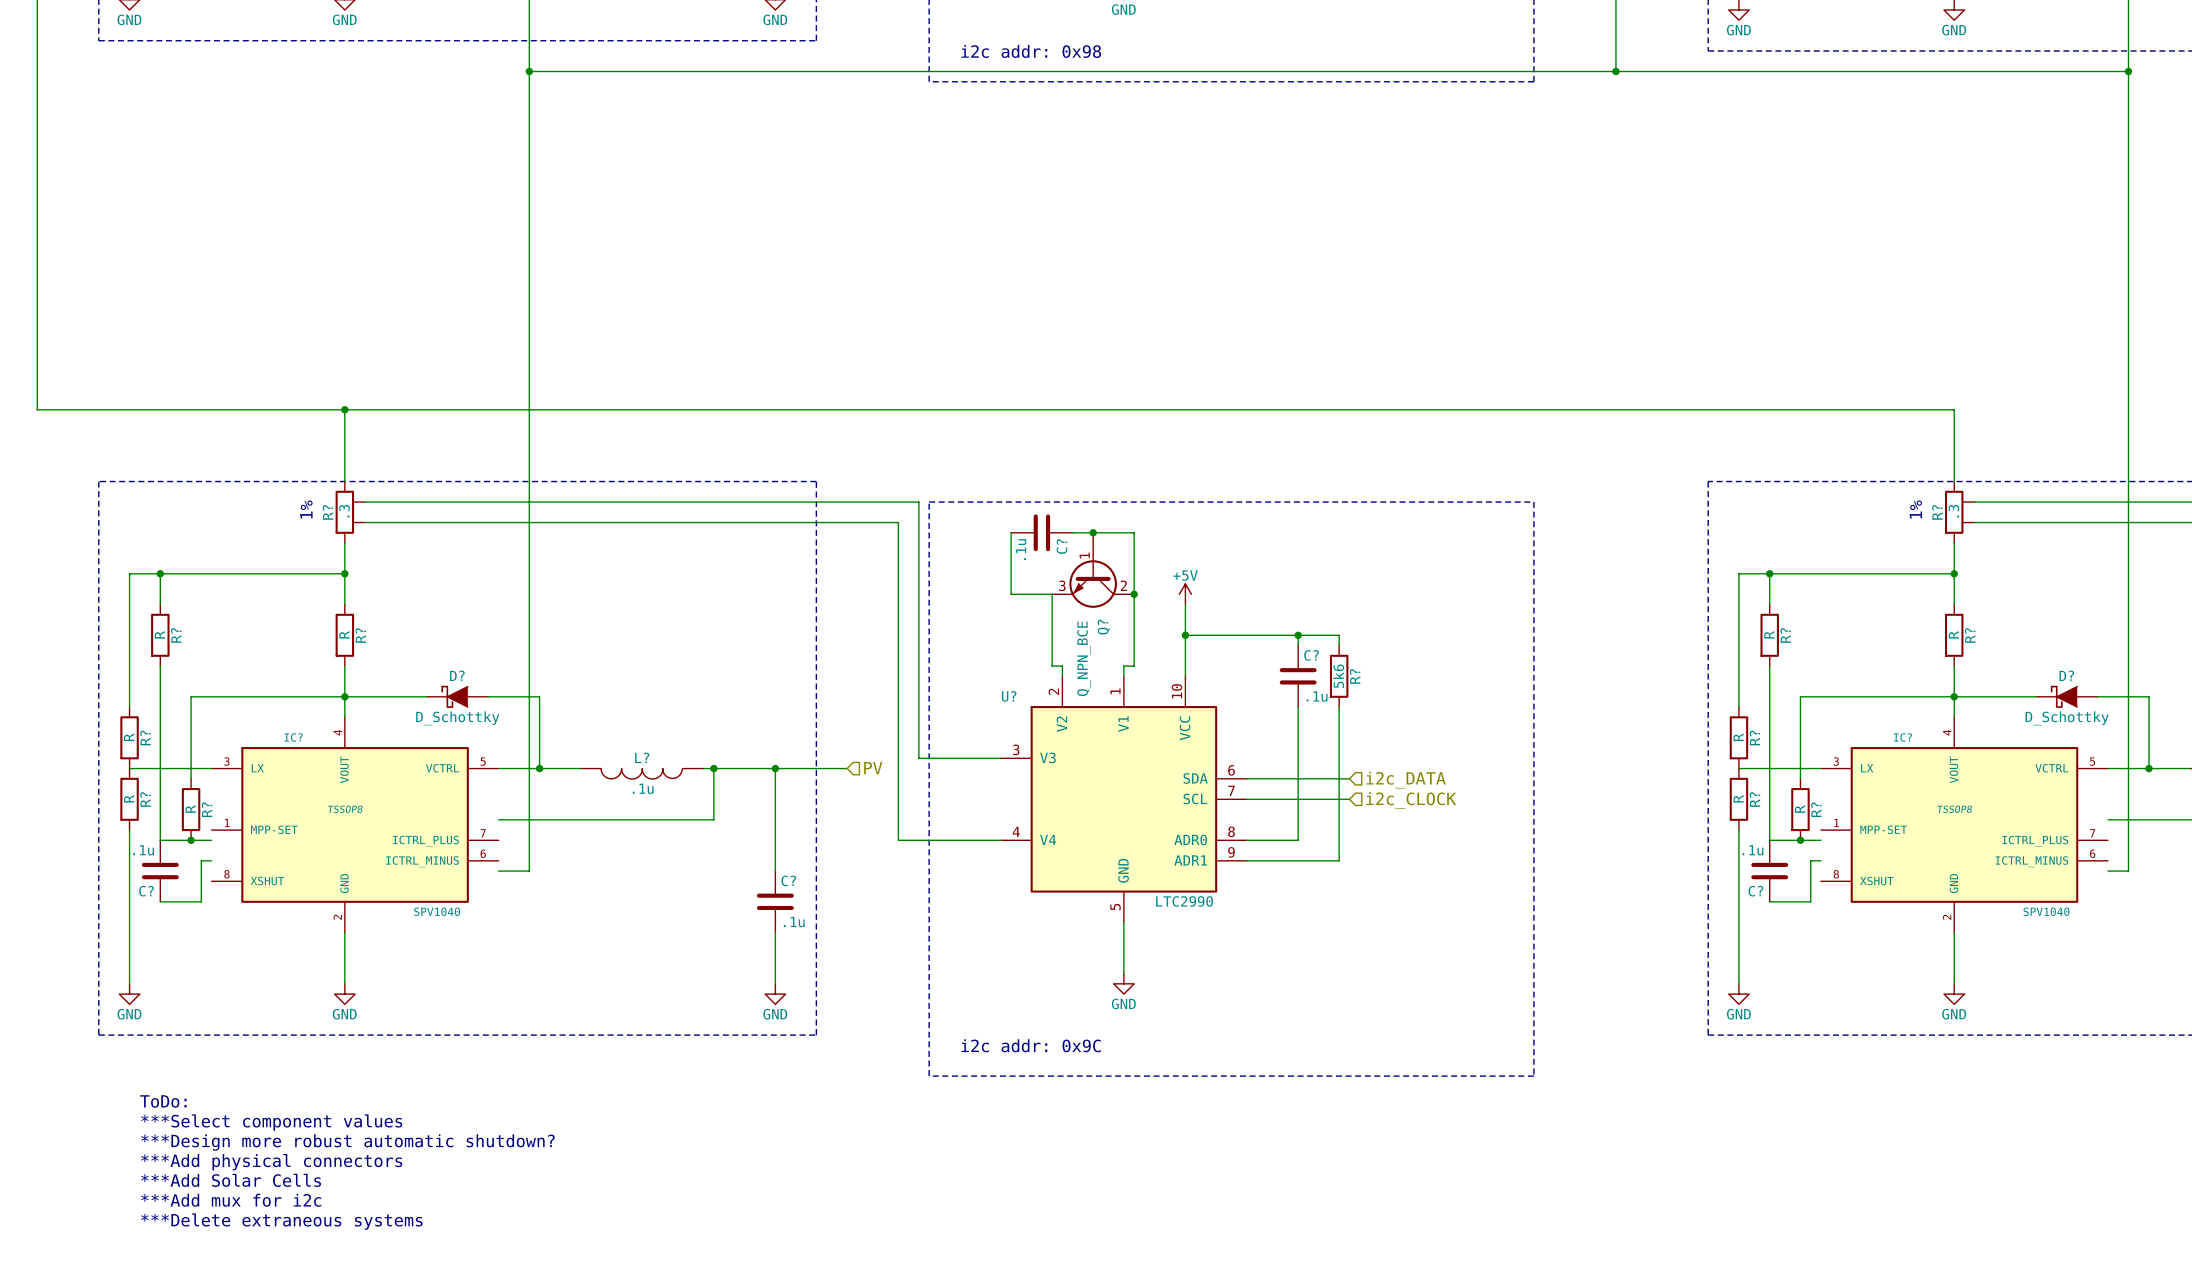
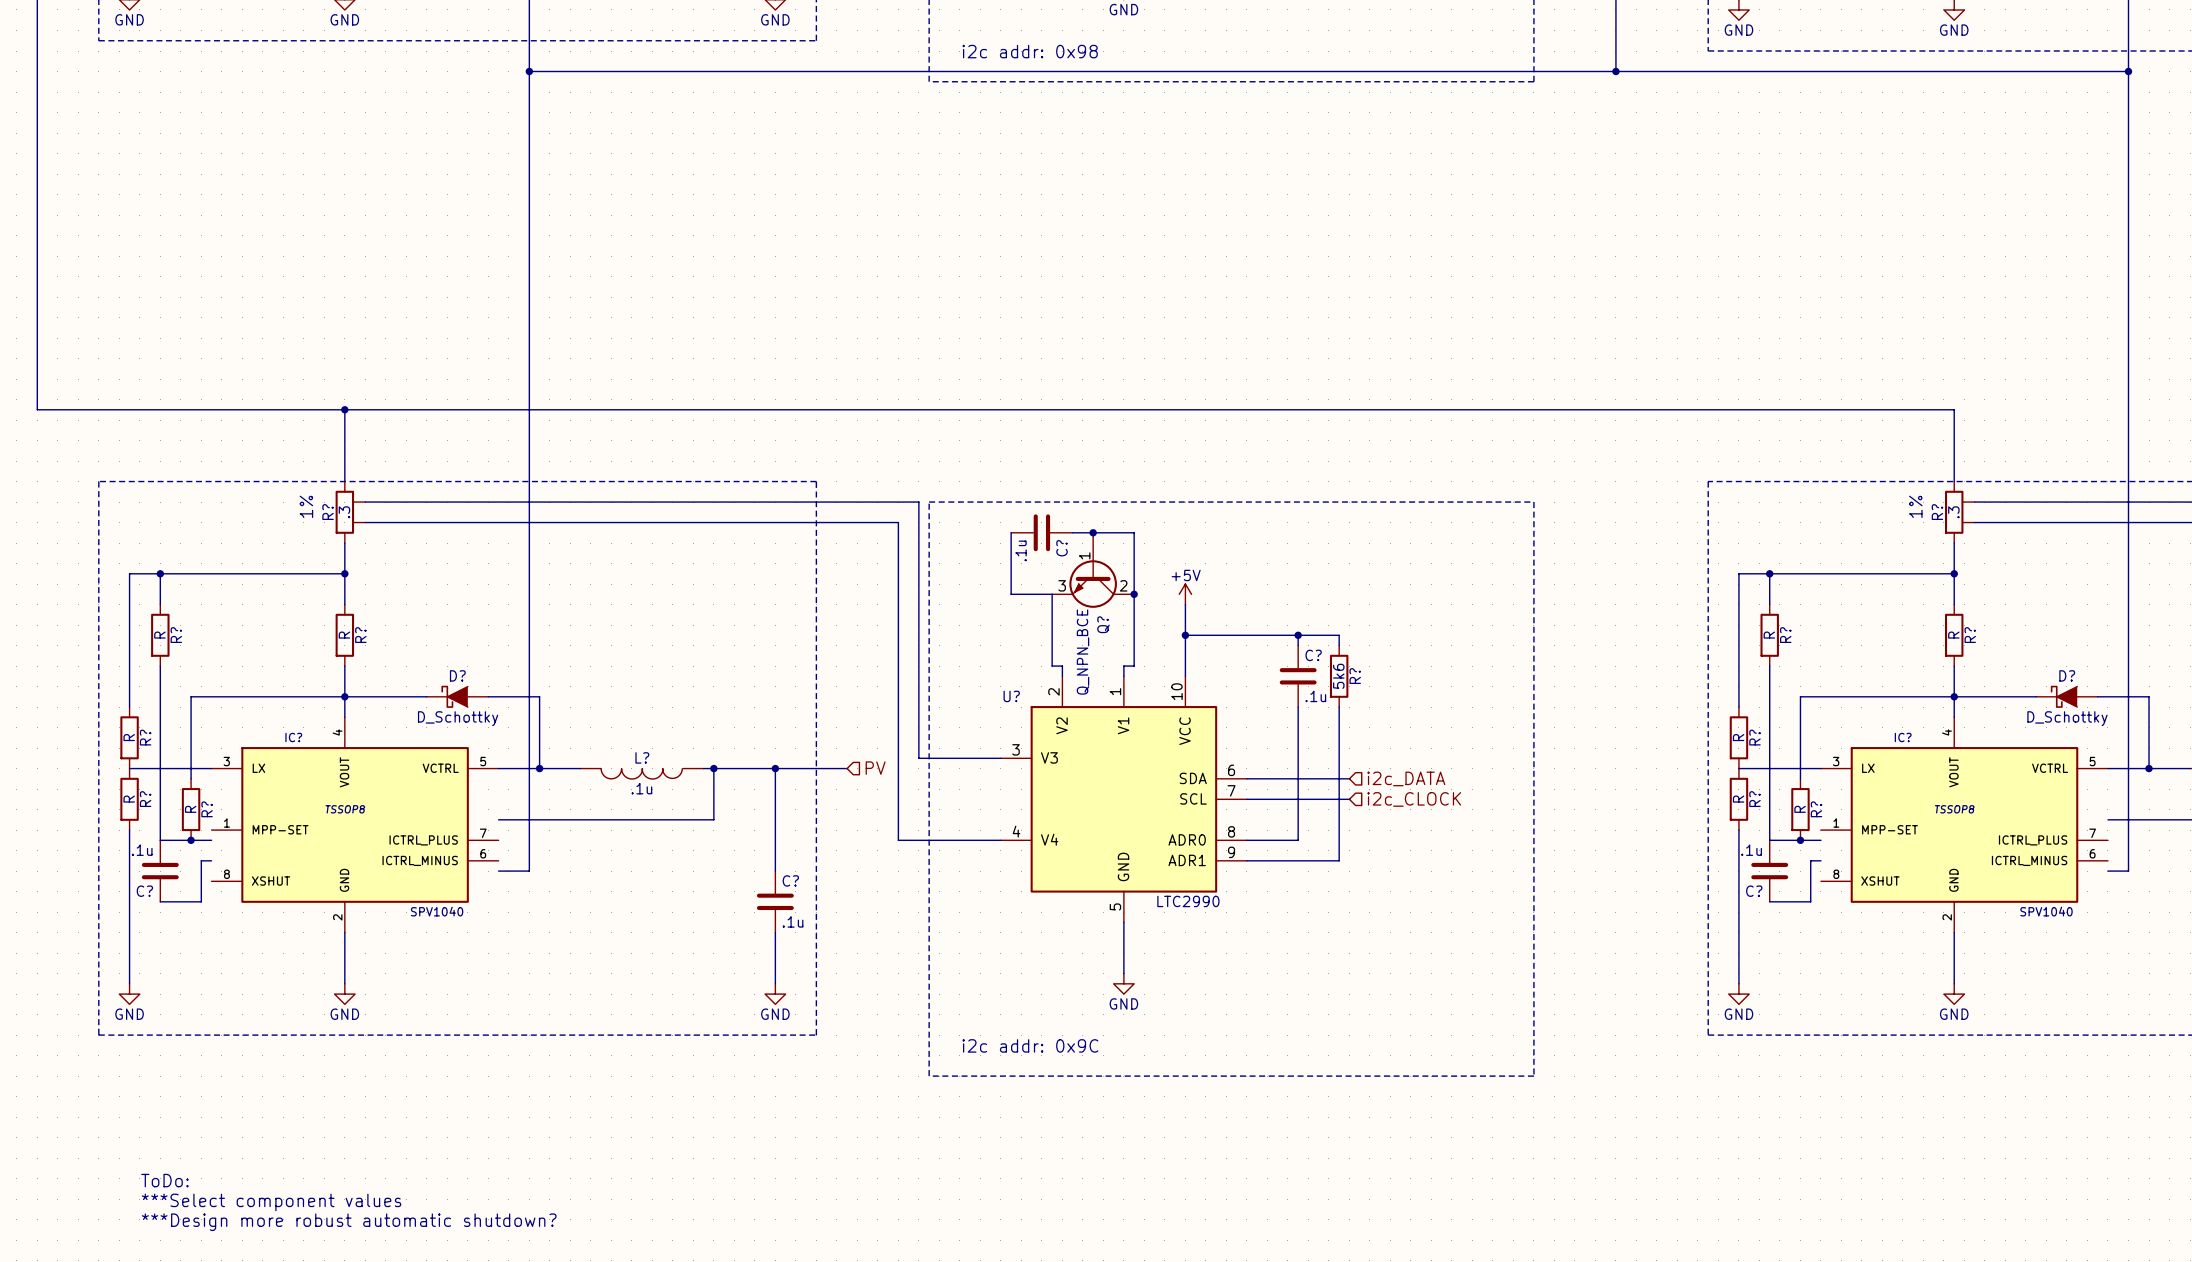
text: ToDo: (163, 1101) -> none
text: ***Select component values (271, 1122) -> none
text: ***Design more robust automatic shutdown? (347, 1142) -> none
text: ***Add physical connectors (271, 1162) -> none
text: ***Add Solar Cells (231, 1180) -> ToDo: (164, 1180)
text: ***Add mux for i2c (231, 1200) -> ***Select component values (271, 1202)
text: ***Delete extraneous systems (281, 1221) -> ***Design more robust automatic shutdown? (349, 1222)

